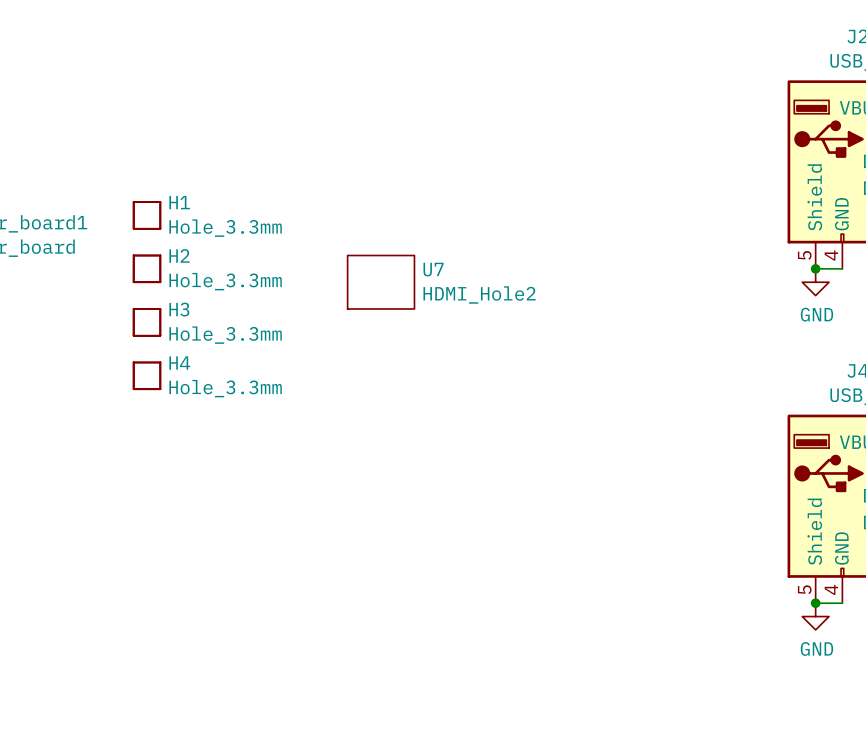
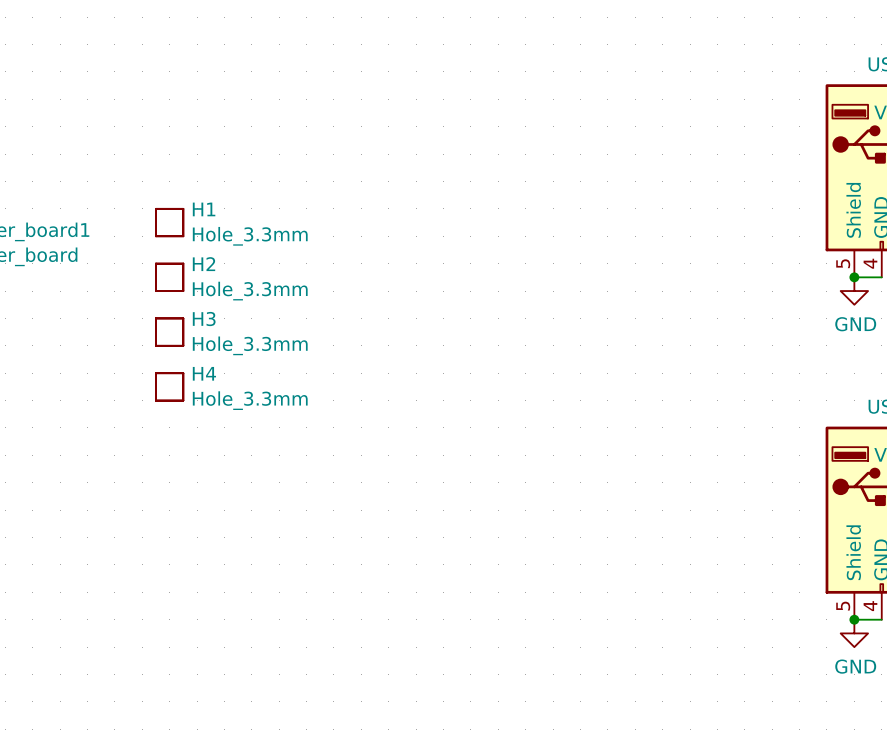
U7: HDMI_Hole2 (381, 282) -> none

